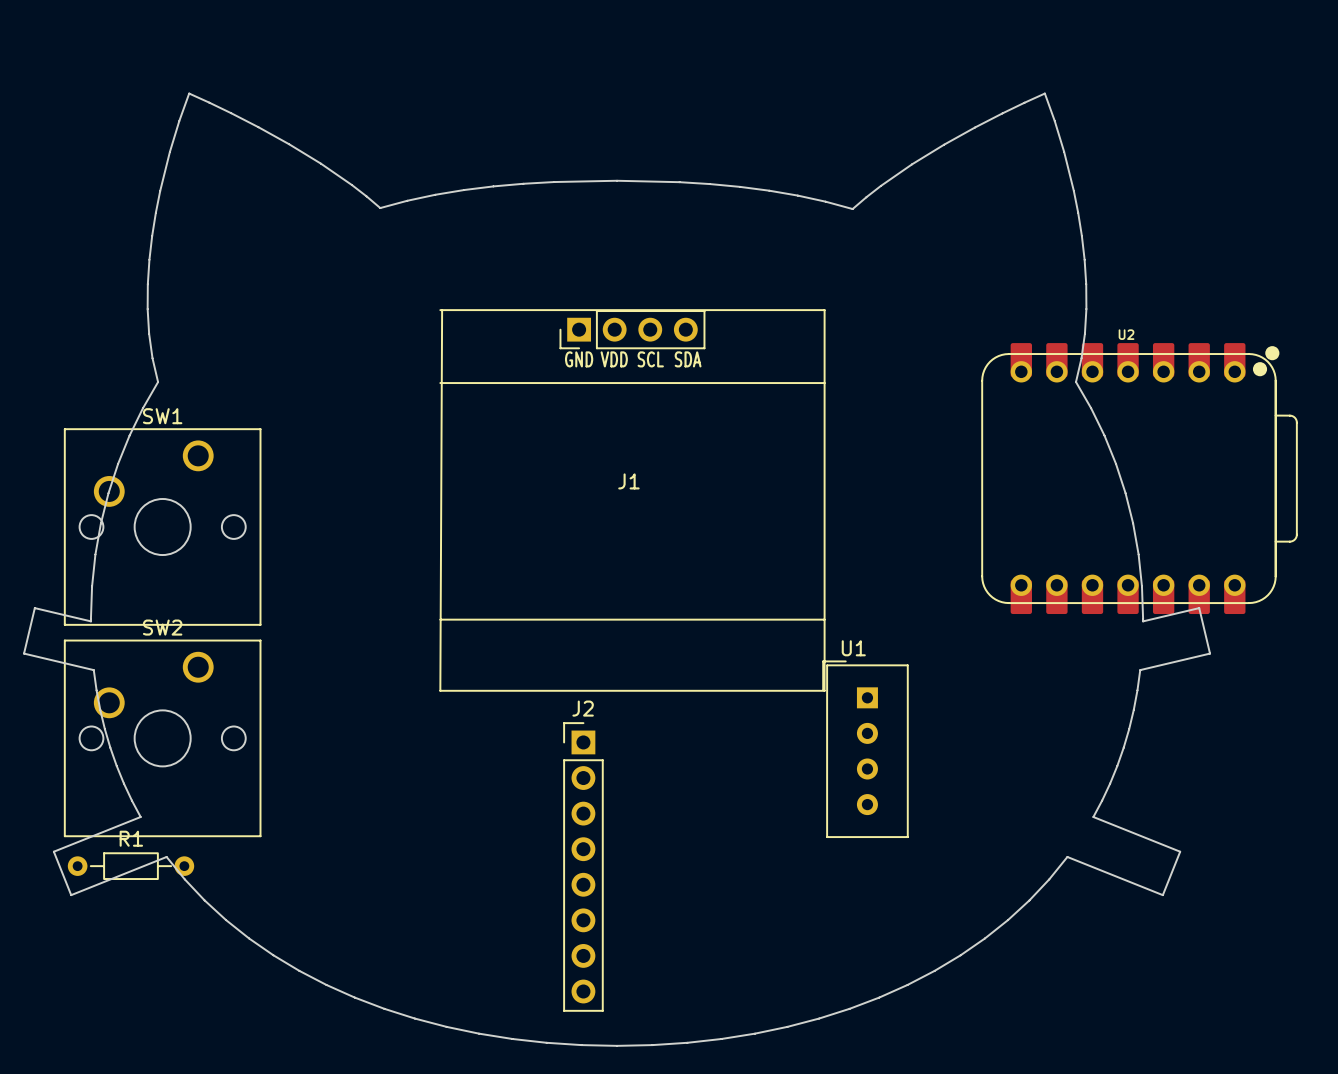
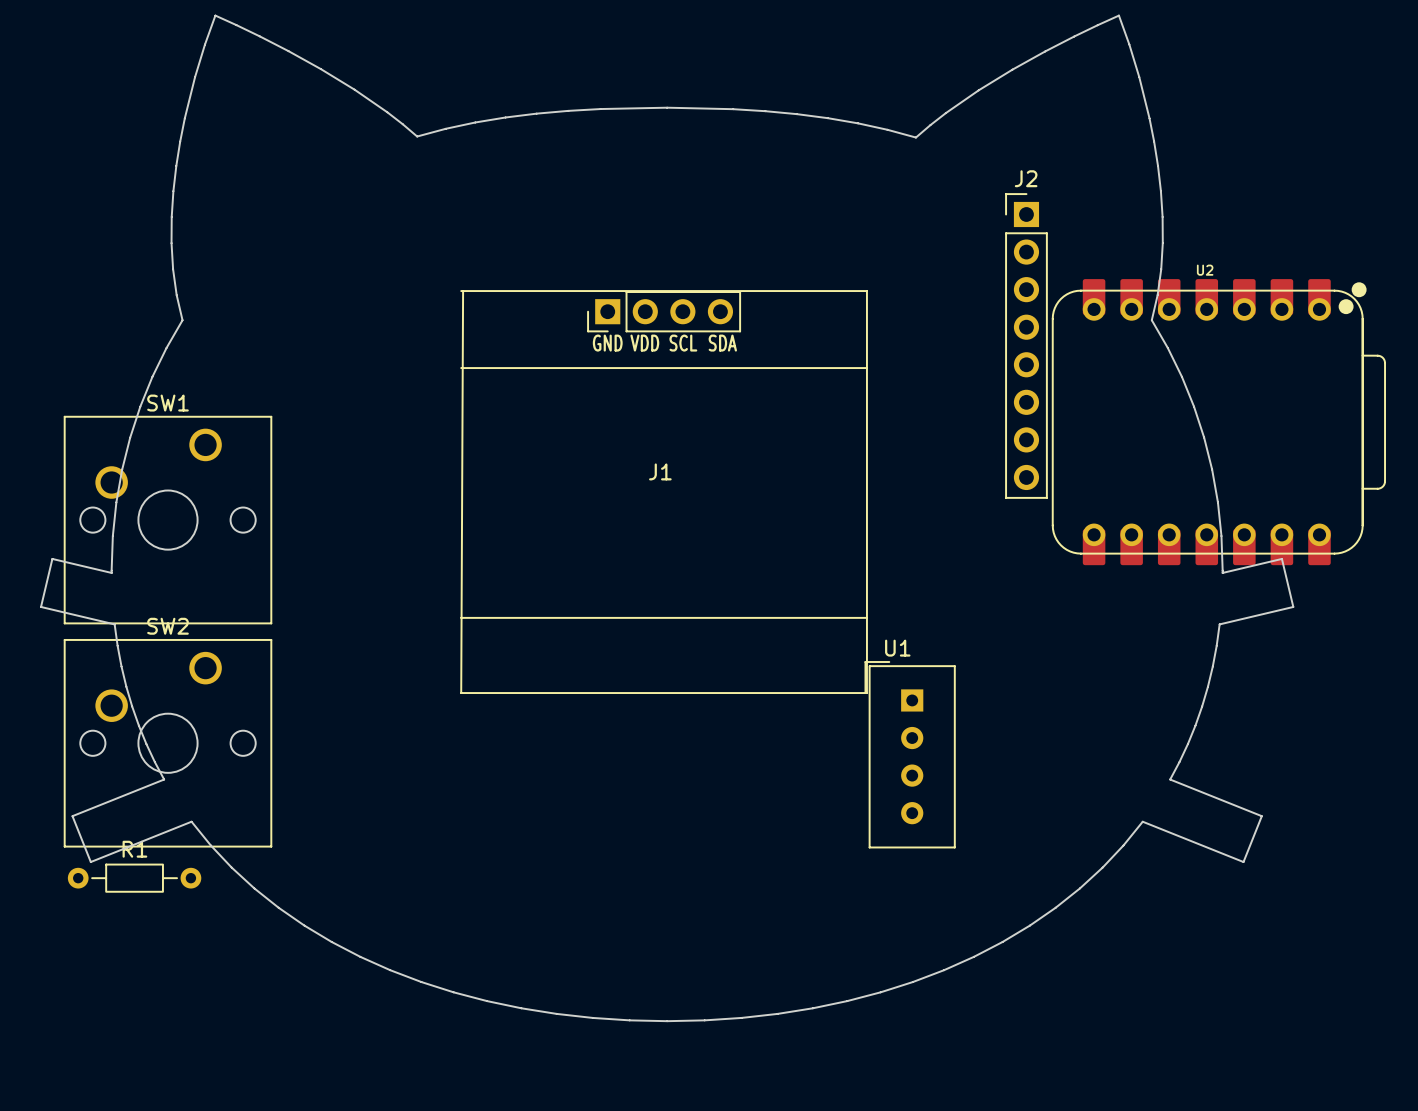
board edge: (189, 93) (169, 151) (160, 190) (149, 259) (147, 309) (149, 333) (158, 382) (129, 435) (108, 493) (95, 554) (91, 621) (34, 608) (24, 653) (93, 670) (100, 710) (110, 747) (123, 783) (140, 817) (53, 851) (71, 895) (166, 856) (204, 900) (249, 938) (299, 970) (354, 997) (414, 1018) (479, 1033) (546, 1042) (617, 1045) (687, 1042) (755, 1033) (819, 1018) (879, 997) (934, 970) (985, 938) (1029, 900) (1067, 856) (1162, 895) (1180, 851) (1093, 817) (1110, 783) (1123, 747) (1133, 710) (1140, 670) (1210, 653) (1199, 608) (1143, 621) (1138, 554) (1125, 493) (1104, 435) (1076, 382) (1084, 333) (1086, 309) (1084, 259) (1073, 190) (1064, 151) (1044, 93) (944, 144) (880, 185) (852, 209) (797, 195) (740, 186) (679, 182) (617, 180) (554, 182) (493, 186) (435, 194) (380, 208) (352, 185) (289, 144) (189, 93) -> (215, 15) (195, 77) (184, 118) (173, 191) (171, 243) (173, 269) (182, 320) (152, 376) (130, 437) (116, 502) (111, 572) (52, 558) (41, 606) (114, 624) (121, 666) (132, 706) (146, 744) (164, 779) (72, 816) (90, 862) (191, 821) (231, 867) (278, 907) (331, 941) (390, 970) (453, 992) (521, 1008) (592, 1017) (667, 1021) (741, 1017) (812, 1008) (880, 992) (944, 970) (1002, 941) (1055, 907) (1102, 867) (1142, 821) (1243, 862) (1261, 816) (1170, 779) (1187, 744) (1202, 706) (1212, 666) (1219, 624) (1293, 606) (1281, 558) (1222, 572) (1217, 502) (1204, 437) (1181, 376) (1151, 320) (1161, 269) (1162, 243) (1160, 191) (1149, 118) (1139, 77) (1118, 15) (1074, 36) (1012, 69) (945, 113) (915, 137) (858, 123) (797, 114) (733, 109) (667, 107) (600, 109) (536, 113) (475, 122) (417, 136) (387, 112) (320, 69) (259, 36) (215, 15)
U2 position: (1139, 478) -> (1218, 422)
J2 position: (583, 866) -> (1026, 345)

